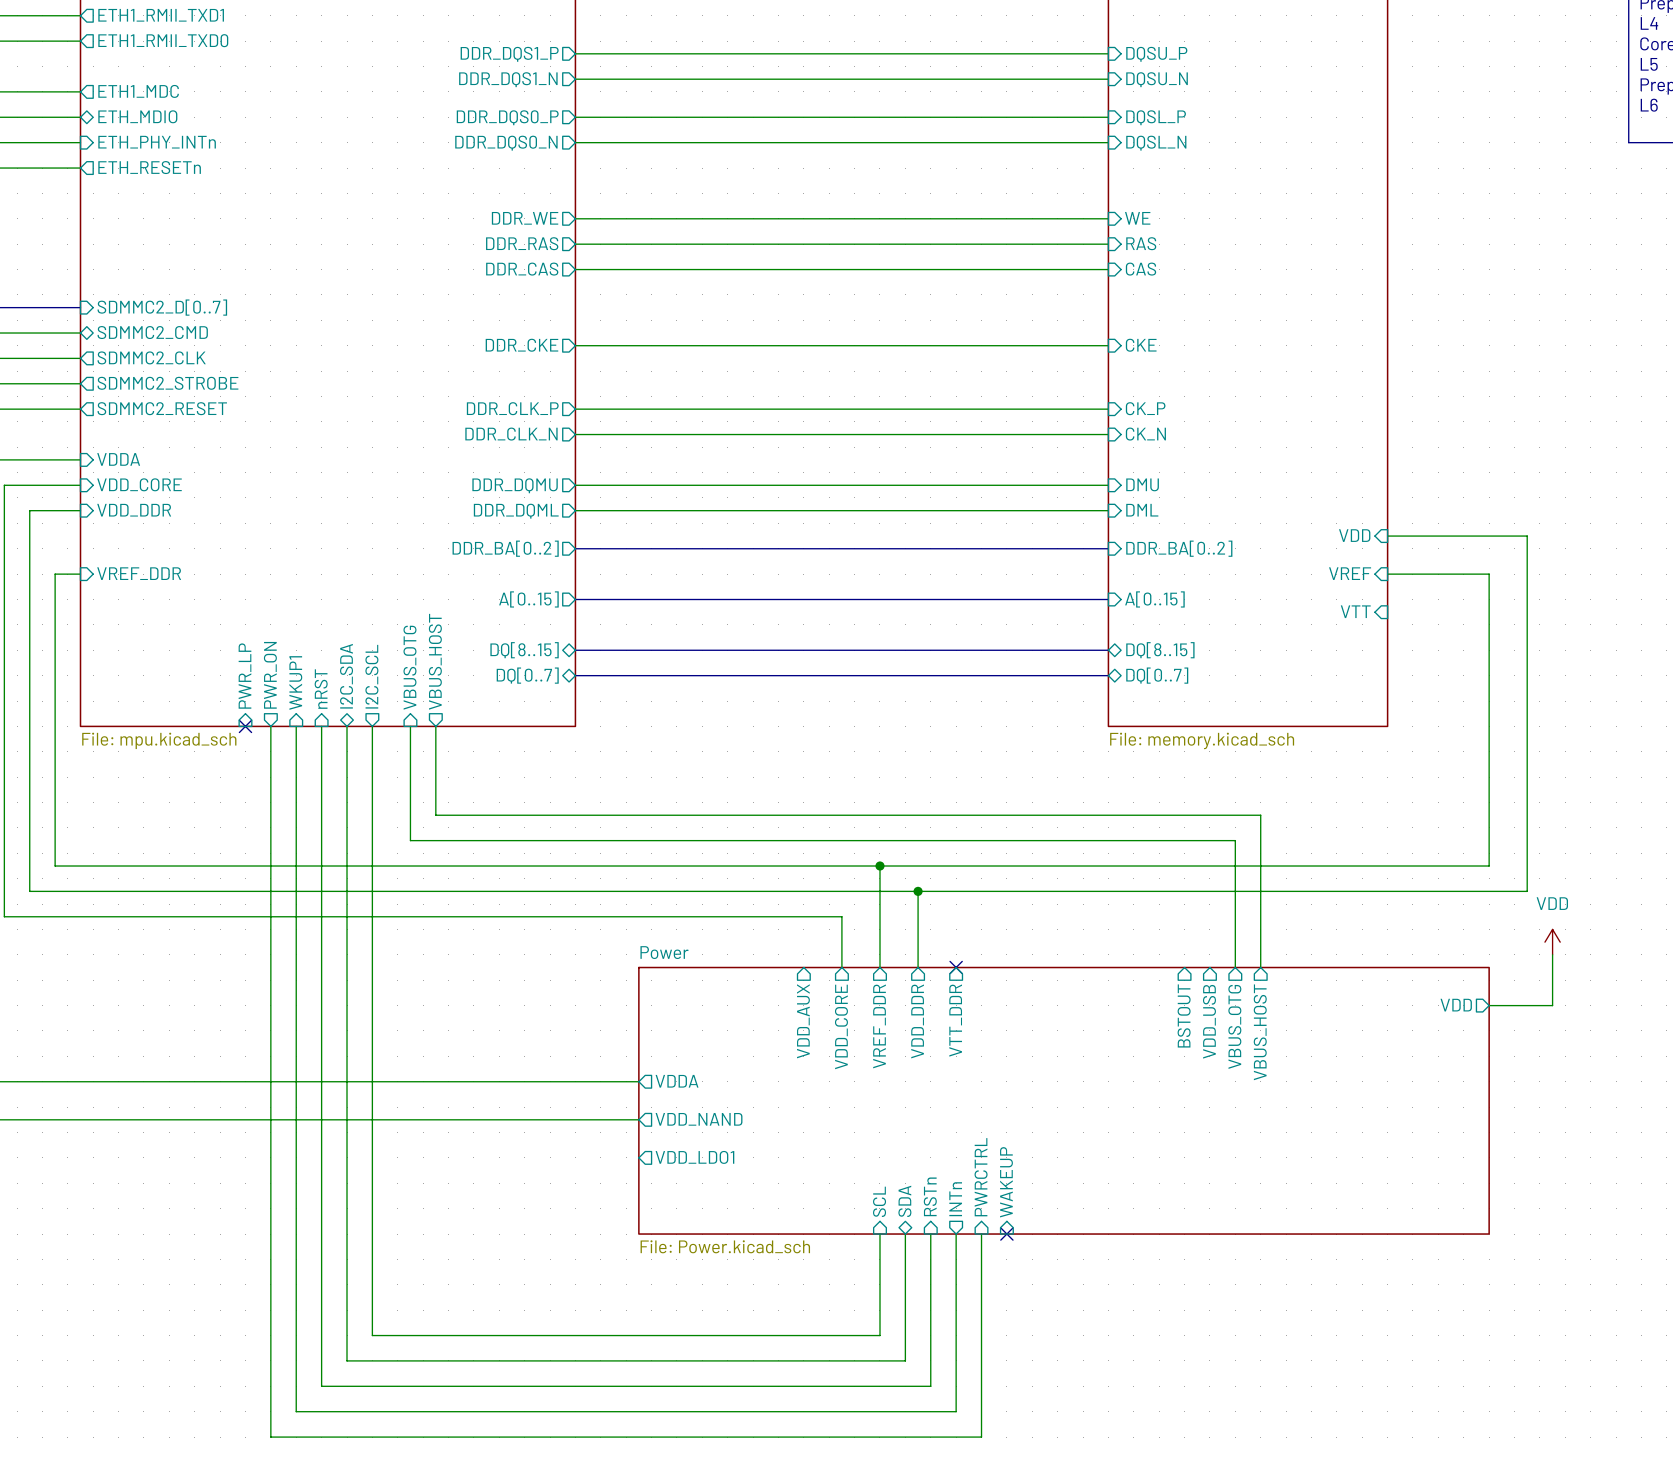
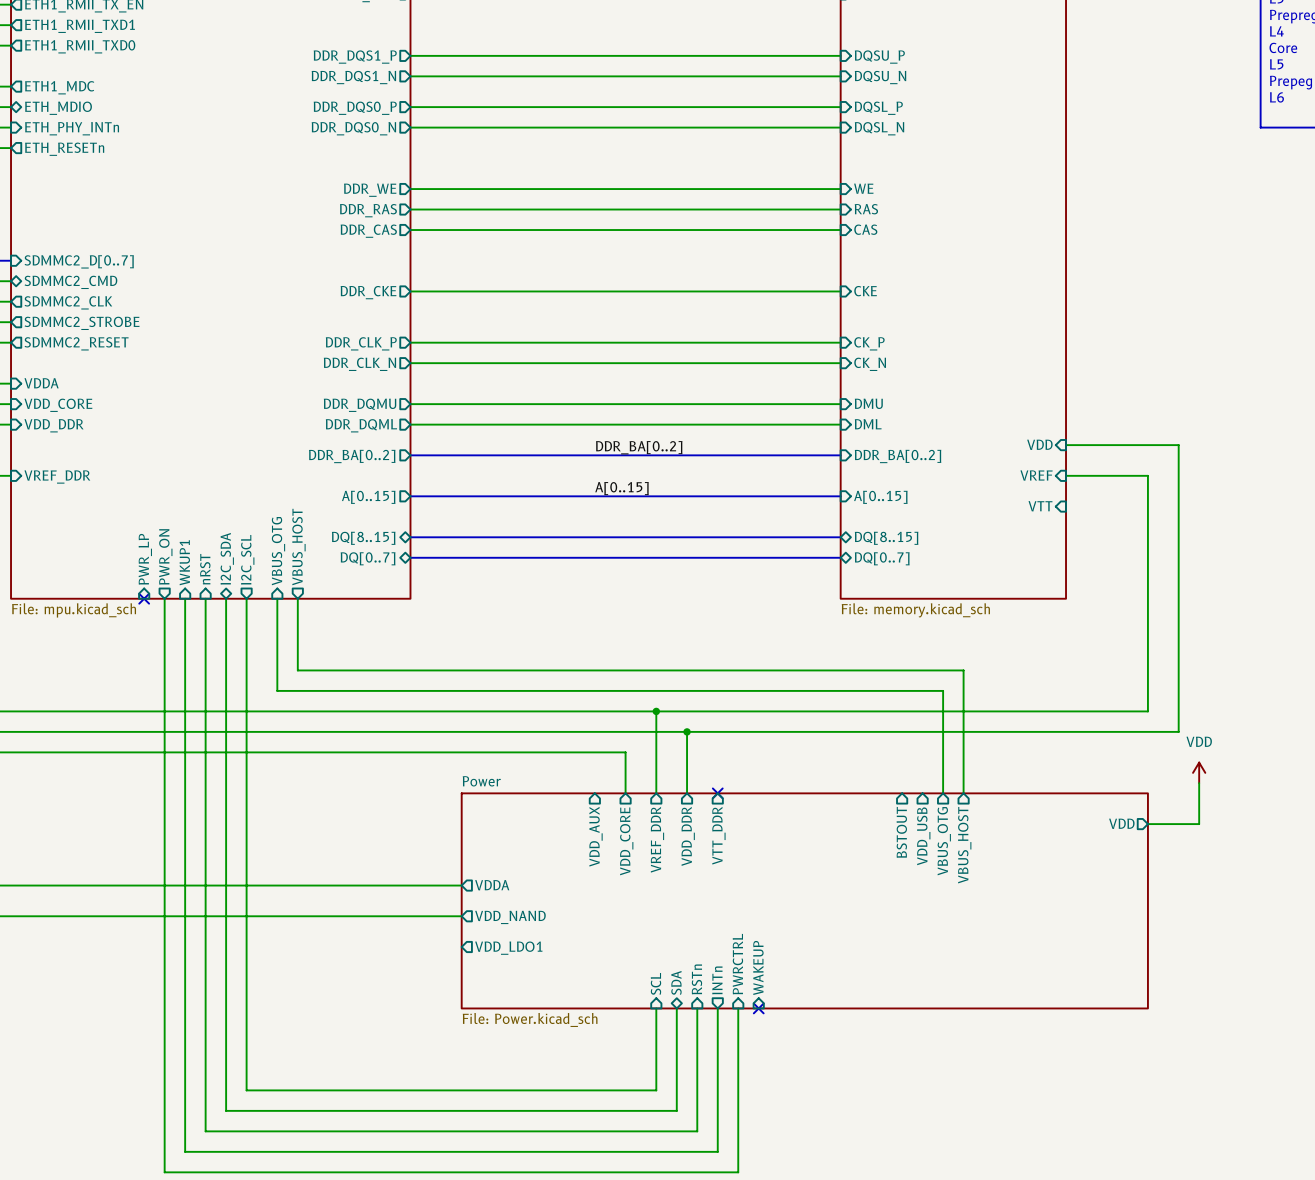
label: none -> DDR_BA[0..2] (639, 447)
label: none -> A[0..15] (622, 488)

